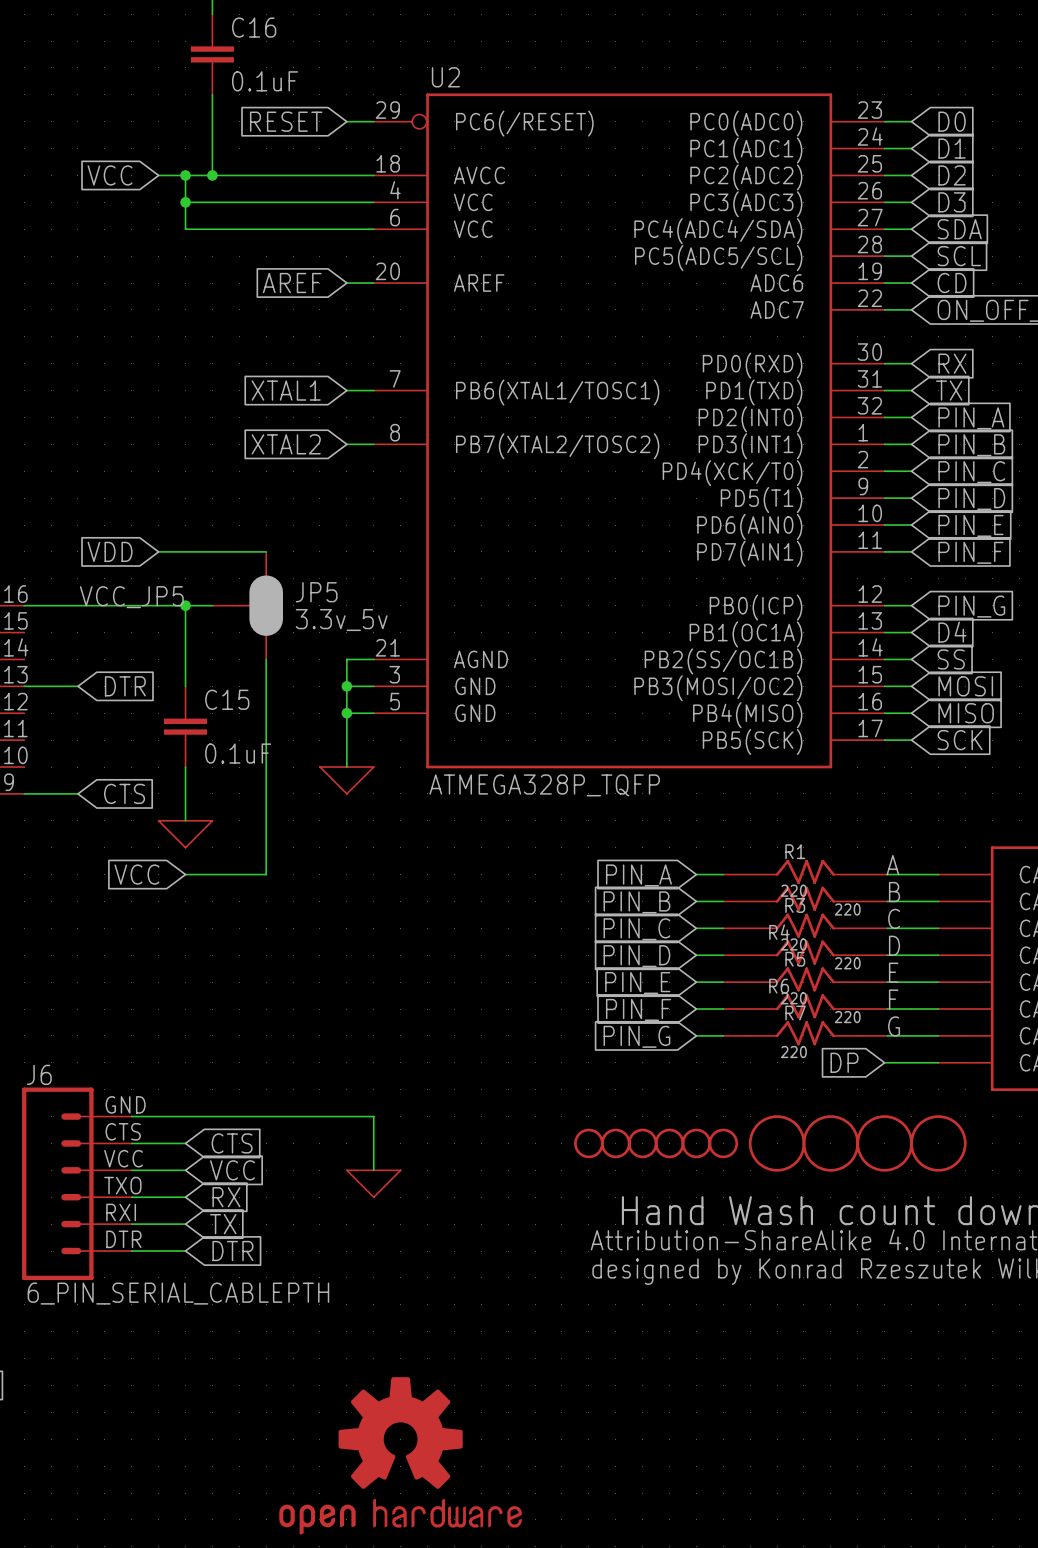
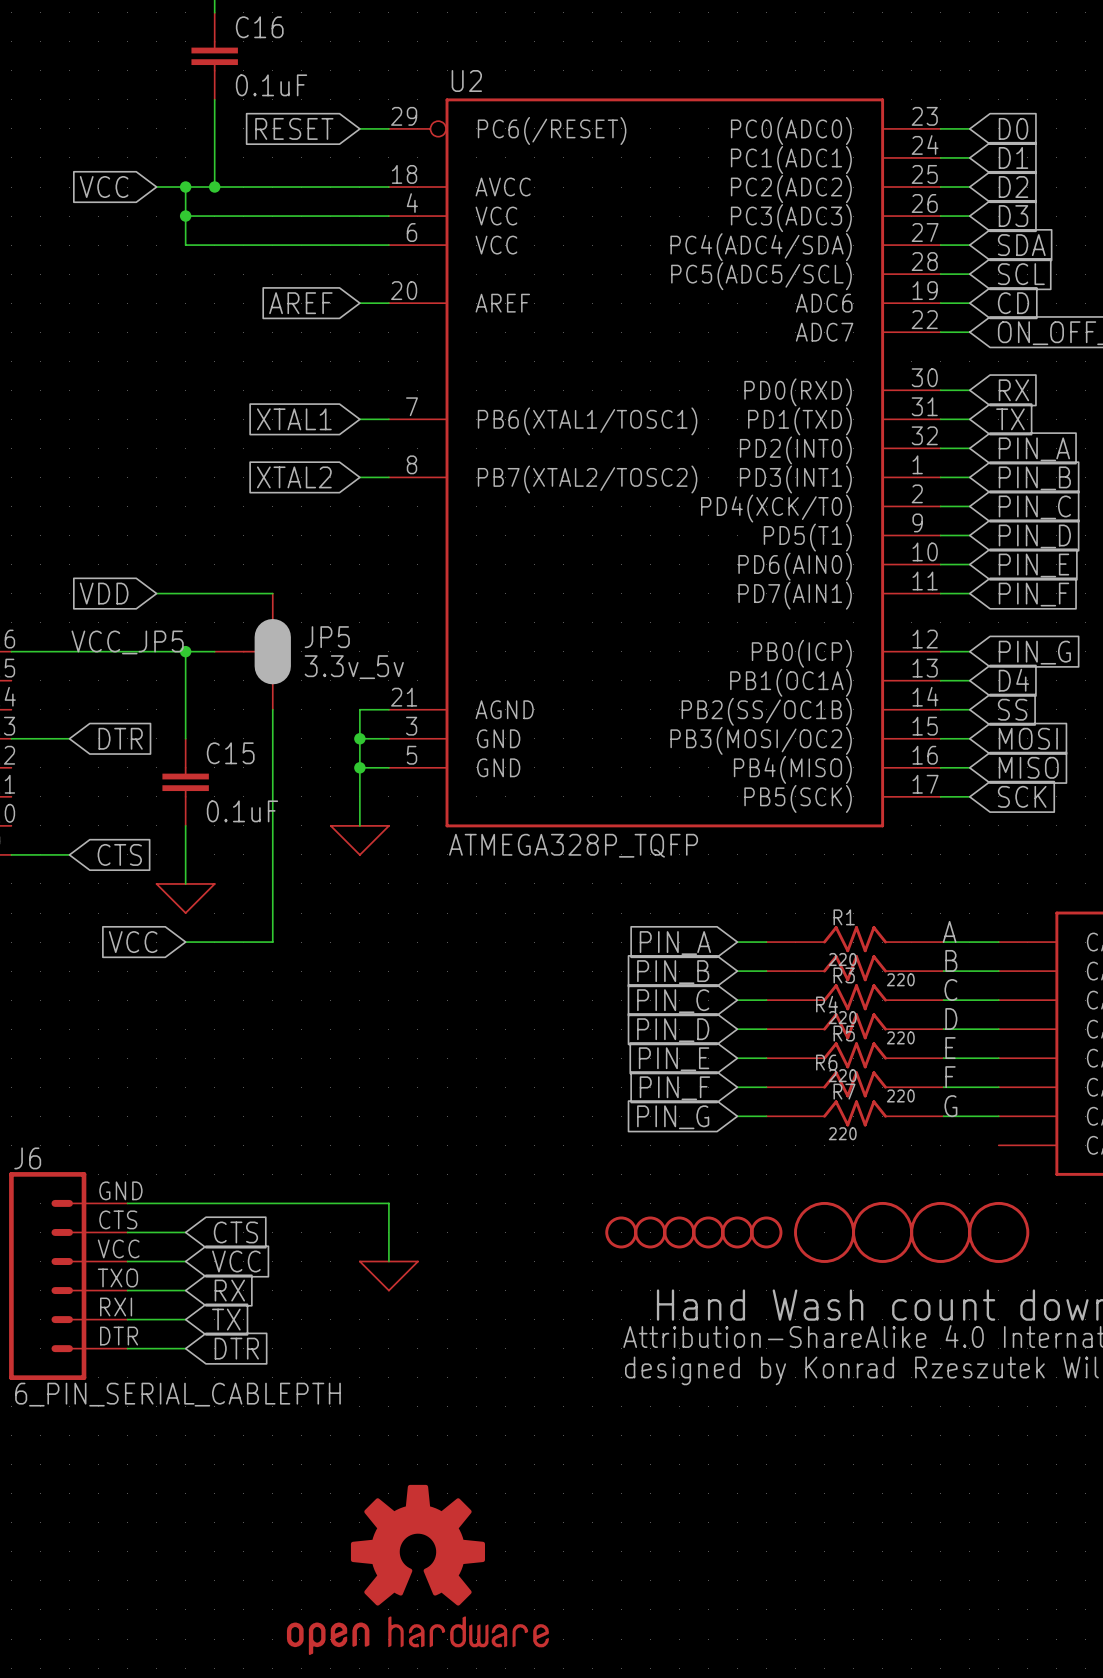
global label: DP (844, 1062) -> none
wire: (884, 1062) (938, 1062) -> none

